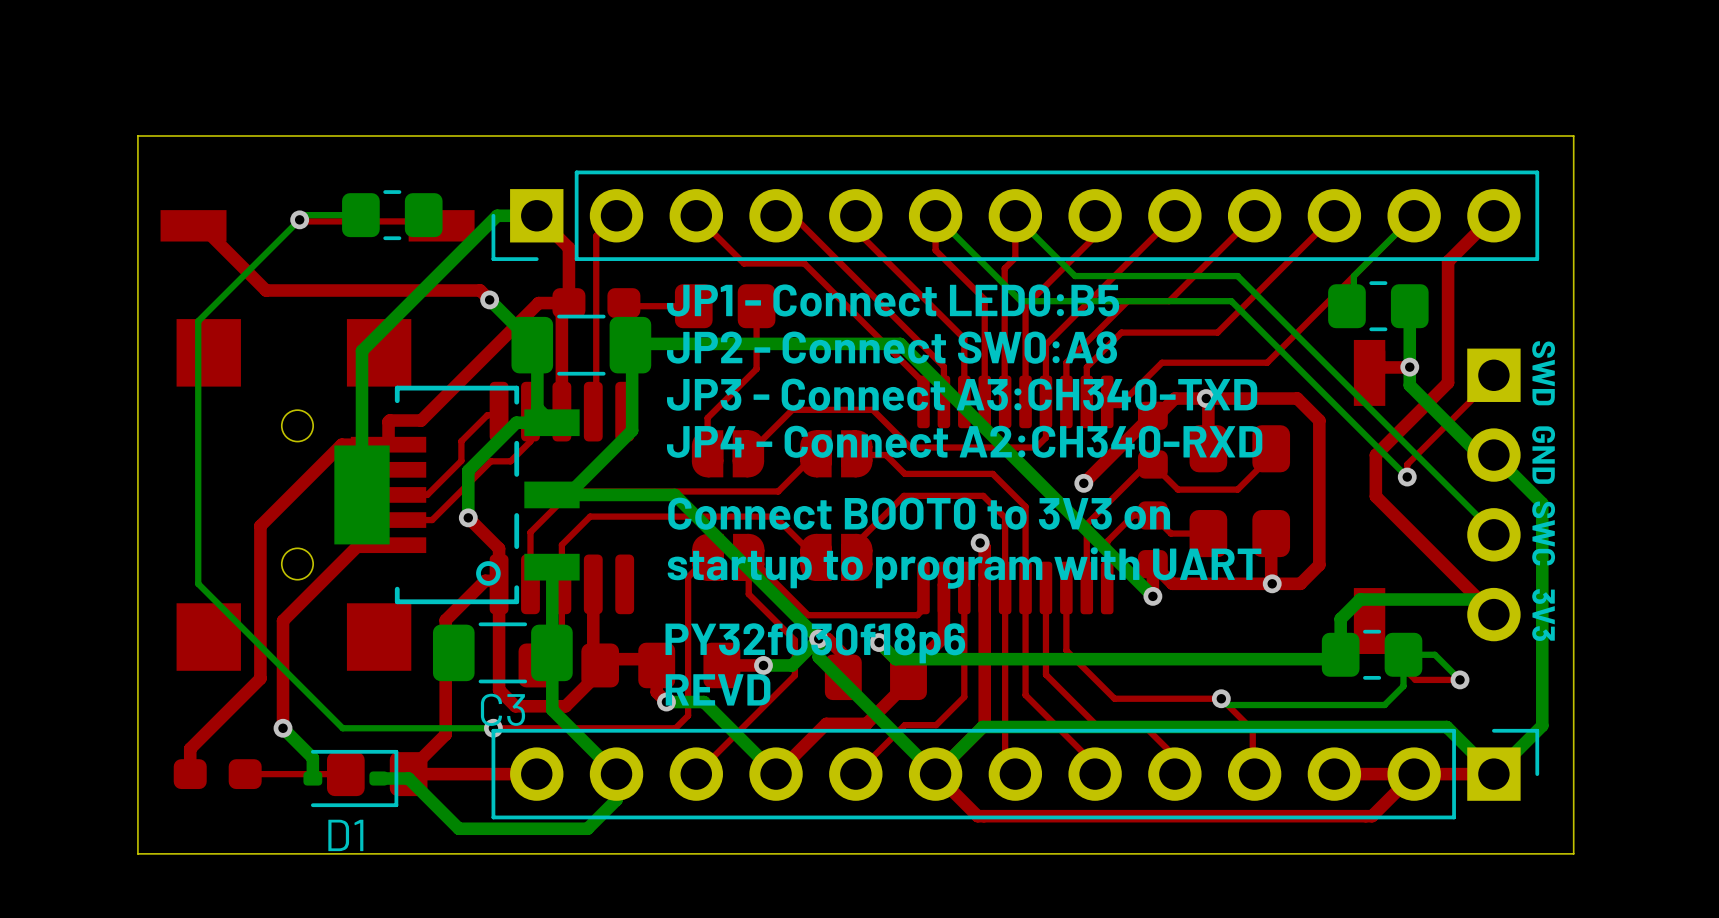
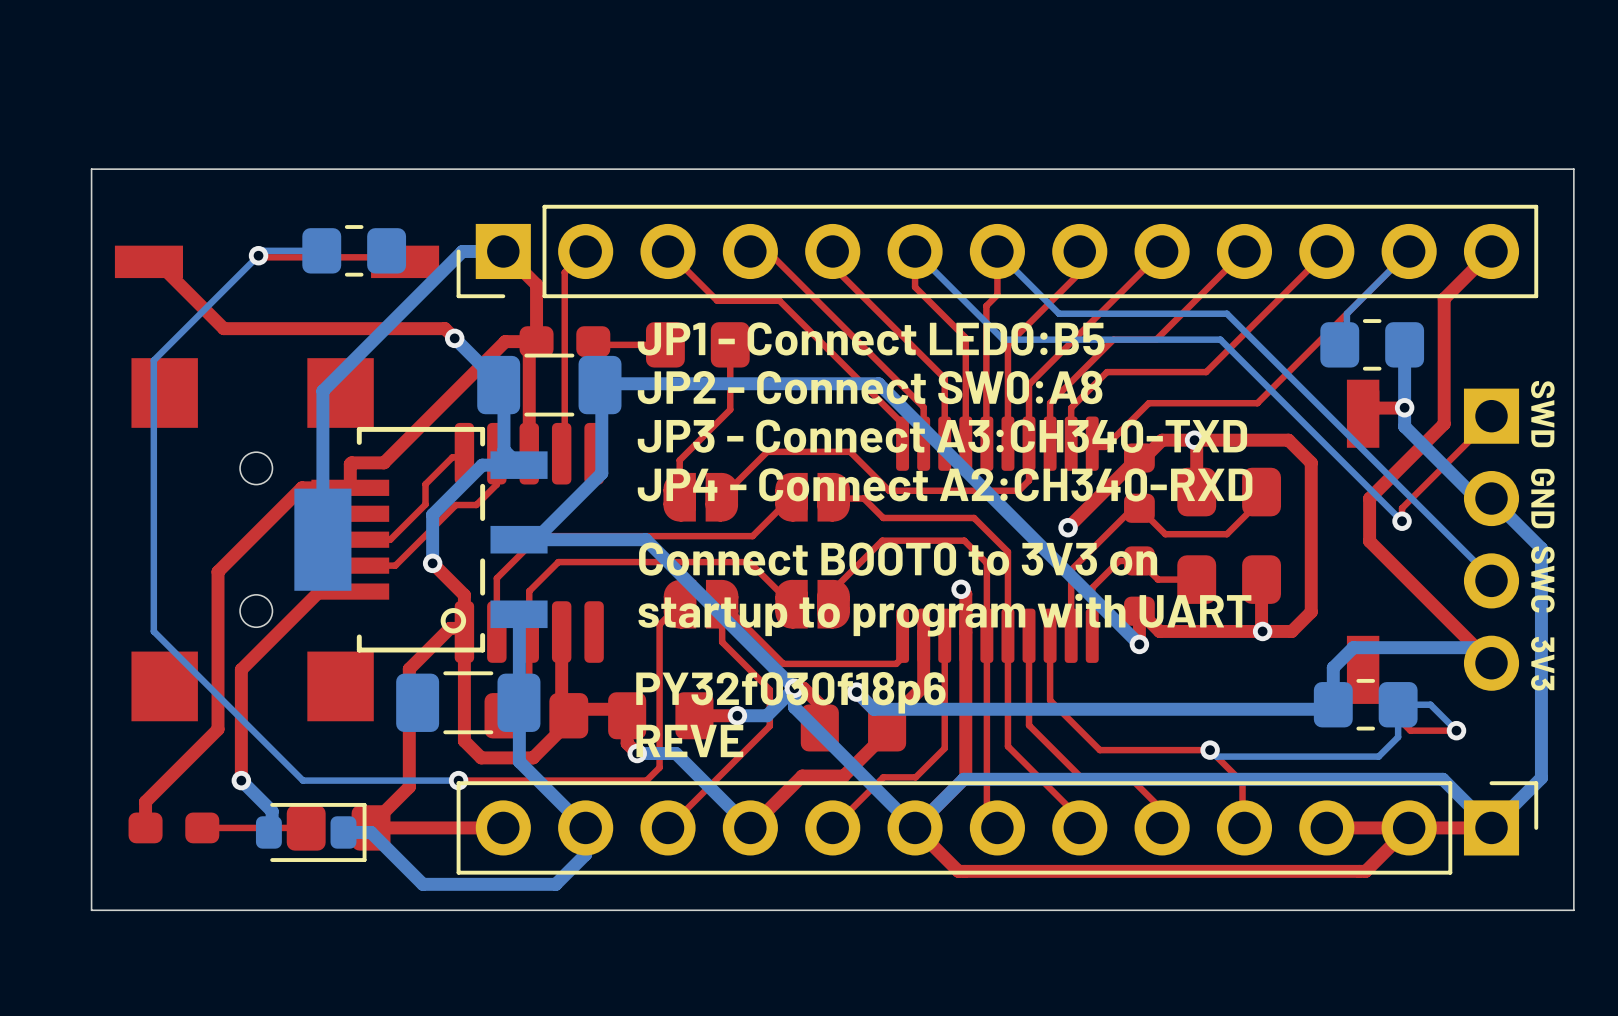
text: REVD (718, 689) -> REVE (689, 740)
C3 name: C3 (503, 709) -> none
D1: (350, 778) -> none
part: none -> (311, 832)

